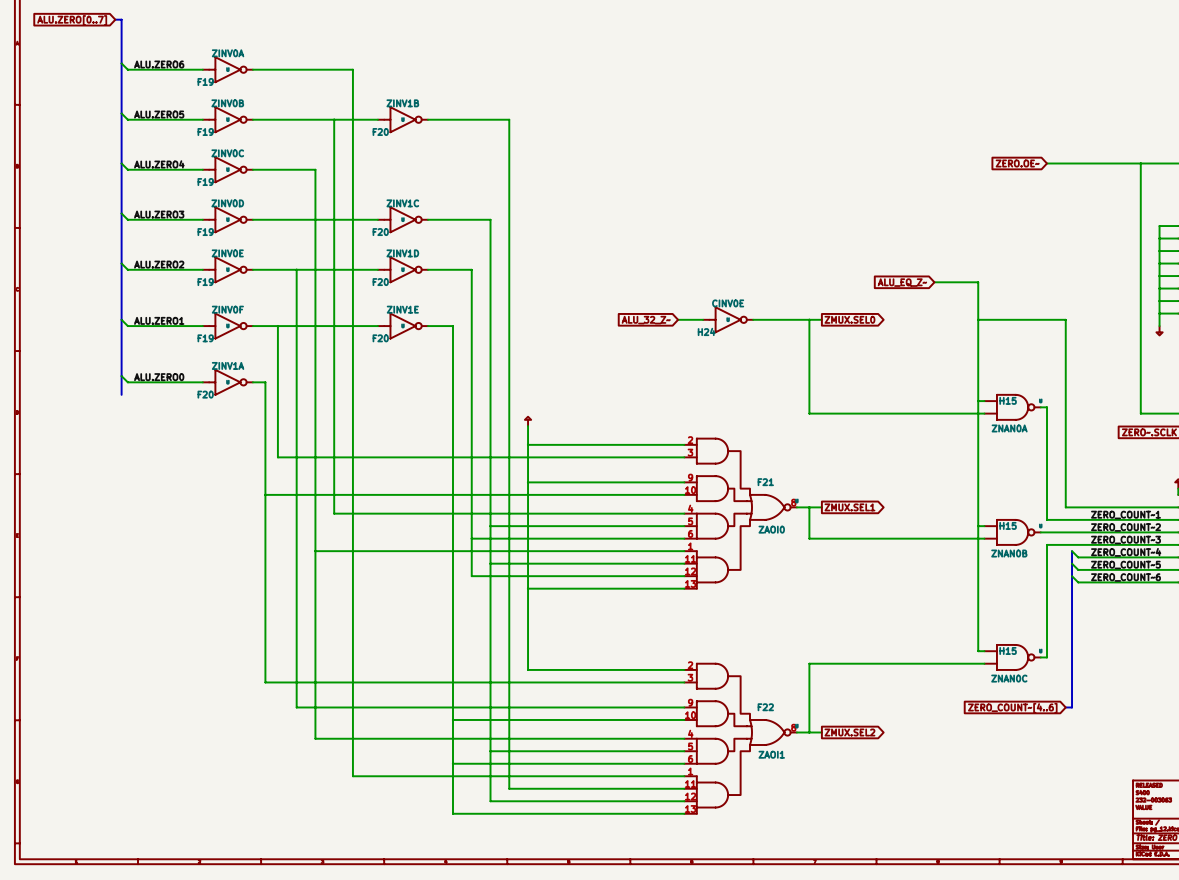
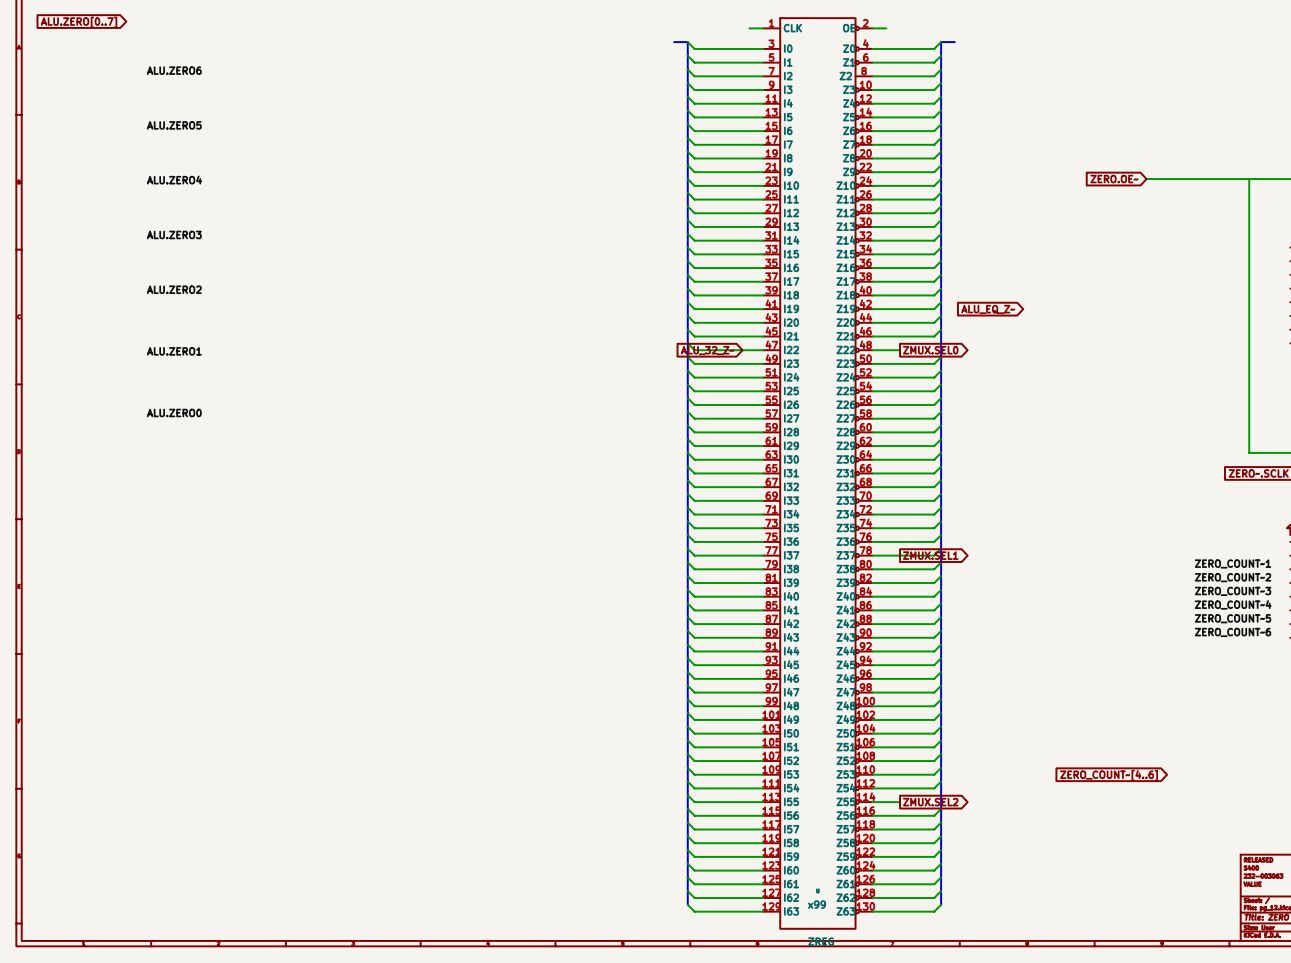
bus: (115, 19) (121, 19) (121, 394) -> none
wire: none -> (749, 28) (763, 28)
wire: none -> (872, 28) (886, 28)
bus: none -> (674, 42) (687, 42) (687, 904)
wire: none -> (687, 42) (694, 48) (763, 48)
wire: none -> (941, 42) (934, 48) (872, 48)
bus: none -> (954, 42) (941, 42) (941, 904)
wire: none -> (687, 55) (694, 62) (763, 62)
wire: none -> (941, 55) (934, 62) (872, 62)
wire: (121, 63) (127, 69) (202, 69) -> none
wire: none -> (687, 69) (694, 76) (763, 76)
wire: none -> (941, 69) (934, 76) (872, 76)
part: (227, 69) -> none
wire: (252, 69) (352, 69) (352, 776) (684, 776) -> none
wire: none -> (687, 83) (694, 90) (763, 90)
wire: none -> (941, 83) (934, 90) (872, 90)
wire: none -> (687, 96) (694, 103) (763, 103)
wire: none -> (941, 96) (934, 103) (872, 103)
wire: none -> (687, 110) (694, 117) (763, 117)
wire: none -> (941, 110) (934, 117) (872, 117)
wire: (121, 113) (127, 119) (202, 119) -> none
wire: none -> (687, 124) (694, 131) (763, 131)
wire: none -> (941, 124) (934, 131) (872, 131)
part: (227, 119) -> none
wire: (252, 119) (377, 119) -> none
wire: (334, 119) (334, 513) (684, 513) -> none
part: (402, 119) -> none
wire: (427, 119) (509, 119) (509, 788) (684, 788) -> none
wire: none -> (687, 137) (694, 144) (763, 144)
wire: none -> (941, 137) (934, 144) (872, 144)
wire: none -> (687, 151) (694, 158) (763, 158)
wire: none -> (941, 151) (934, 158) (872, 158)
wire: none -> (687, 165) (694, 172) (763, 172)
wire: none -> (941, 165) (934, 172) (872, 172)
wire: (121, 163) (127, 169) (202, 169) -> none
wire: none -> (687, 179) (694, 185) (763, 185)
wire: none -> (941, 179) (934, 185) (872, 185)
part: (227, 169) -> none
wire: (252, 169) (315, 169) (315, 738) (684, 738) -> none
wire: none -> (687, 192) (694, 199) (763, 199)
wire: none -> (941, 192) (934, 199) (872, 199)
wire: none -> (687, 206) (694, 213) (763, 213)
wire: none -> (941, 206) (934, 213) (872, 213)
wire: none -> (687, 220) (694, 226) (763, 226)
wire: none -> (941, 220) (934, 226) (872, 226)
wire: (121, 213) (127, 219) (202, 219) -> none
wire: none -> (687, 233) (694, 240) (763, 240)
wire: none -> (941, 233) (934, 240) (872, 240)
part: (227, 219) -> none
wire: (252, 219) (377, 219) -> none
part: (402, 219) -> none
wire: (427, 219) (490, 219) (490, 801) (684, 801) -> none
wire: none -> (687, 247) (694, 254) (763, 254)
wire: none -> (941, 247) (934, 254) (872, 254)
wire: (1178, 226) (1159, 226) (1159, 326) -> none
wire: none -> (687, 261) (694, 268) (763, 268)
wire: none -> (941, 261) (934, 268) (872, 268)
wire: (1159, 238) (1178, 238) -> none
wire: none -> (687, 274) (694, 281) (763, 281)
wire: none -> (941, 274) (934, 281) (872, 281)
wire: (1159, 251) (1178, 251) -> none
wire: (121, 263) (127, 269) (202, 269) -> none
wire: none -> (687, 288) (694, 295) (763, 295)
wire: none -> (941, 288) (934, 295) (872, 295)
wire: (1159, 263) (1178, 263) -> none
part: (227, 269) -> none
wire: (252, 269) (377, 269) -> none
wire: (296, 269) (296, 707) (634, 707) -> (687, 767) (694, 774)
part: (402, 269) -> none
wire: (427, 269) (471, 269) (471, 576) (684, 576) -> none
wire: none -> (687, 302) (694, 309) (763, 309)
wire: none -> (941, 302) (934, 309) (872, 309)
wire: (1159, 276) (1178, 276) -> none
wire: (934, 282) (978, 282) (978, 651) (984, 651) -> none
wire: none -> (687, 315) (694, 322) (763, 322)
wire: none -> (941, 315) (934, 322) (872, 322)
wire: (1159, 288) (1178, 288) -> none
wire: none -> (687, 329) (694, 336) (763, 336)
wire: none -> (941, 329) (934, 336) (872, 336)
wire: (1159, 301) (1178, 301) -> none
wire: none -> (687, 343) (694, 350) (742, 350)
wire: (1159, 313) (1178, 313) -> none
wire: (121, 319) (127, 326) (202, 326) -> none
part: (728, 319) -> none
wire: (753, 319) (796, 319) -> none
wire: (809, 319) (809, 413) (984, 413) -> none
wire: (978, 319) (1065, 319) (1065, 507) (1178, 507) -> none
part: (227, 326) -> none
wire: (252, 326) (377, 326) -> none
wire: (277, 326) (277, 457) (634, 457) -> (687, 494) (694, 500)
part: (402, 326) -> none
wire: (427, 326) (452, 326) (452, 813) (684, 813) -> none
wire: none -> (687, 357) (694, 363) (763, 363)
wire: none -> (941, 357) (934, 363) (872, 363)
power symbol: (1159, 330) -> none
wire: none -> (687, 370) (694, 377) (763, 377)
wire: none -> (941, 370) (934, 377) (872, 377)
wire: none -> (687, 384) (694, 391) (763, 391)
wire: none -> (941, 384) (934, 391) (872, 391)
wire: none -> (687, 398) (694, 404) (763, 404)
wire: none -> (941, 398) (934, 404) (872, 404)
wire: (121, 376) (127, 382) (202, 382) -> none
wire: none -> (687, 411) (694, 418) (763, 418)
wire: none -> (941, 411) (934, 418) (872, 418)
part: (227, 382) -> none
wire: (252, 382) (265, 382) (265, 682) (634, 682) -> (687, 740) (694, 747)
wire: none -> (687, 425) (694, 432) (763, 432)
wire: none -> (941, 425) (934, 432) (872, 432)
wire: none -> (687, 439) (694, 446) (763, 446)
wire: none -> (941, 439) (934, 446) (872, 446)
wire: (978, 401) (984, 401) -> none
part: (1012, 407) -> none
wire: (1040, 407) (1047, 407) (1047, 519) (1178, 519) -> none
wire: none -> (687, 452) (694, 459) (763, 459)
wire: none -> (941, 452) (934, 459) (872, 459)
power symbol: (528, 421) -> none
wire: (528, 426) (528, 669) (634, 669) -> (687, 726) (694, 733)
wire: none -> (687, 466) (694, 473) (763, 473)
wire: none -> (941, 466) (934, 473) (872, 473)
part: none -> (817, 473)
wire: none -> (941, 480) (934, 487) (872, 487)
wire: (528, 444) (634, 444) -> (687, 480) (694, 487)
wire: none -> (941, 494) (934, 500) (872, 500)
wire: none -> (687, 507) (694, 514) (763, 514)
wire: none -> (941, 507) (934, 514) (872, 514)
wire: none -> (941, 521) (934, 528) (872, 528)
wire: (528, 482) (634, 482) -> (687, 521) (694, 528)
wire: none -> (941, 535) (934, 541) (872, 541)
wire: (1178, 488) (1178, 494) -> none
wire: (265, 494) (634, 494) -> (687, 535) (694, 541)
wire: none -> (687, 548) (694, 555) (763, 555)
wire: none -> (941, 548) (934, 555) (900, 555)
wire: (809, 507) (809, 538) (984, 538) -> none
wire: none -> (687, 562) (694, 569) (763, 569)
part: (740, 513) -> none
wire: none -> (941, 562) (934, 569) (872, 569)
wire: (490, 526) (684, 526) -> none
wire: none -> (687, 576) (694, 583) (763, 583)
wire: none -> (941, 576) (934, 583) (872, 583)
wire: (978, 526) (984, 526) -> none
part: (1012, 532) -> none
wire: (1040, 532) (1178, 532) -> none
wire: (471, 538) (684, 538) -> none
wire: none -> (687, 589) (694, 596) (763, 596)
wire: none -> (941, 589) (934, 596) (872, 596)
wire: (1178, 544) (1047, 544) (1047, 657) (1040, 657) -> none
wire: (315, 551) (684, 551) -> none
wire: none -> (687, 603) (694, 610) (763, 610)
wire: none -> (941, 603) (934, 610) (872, 610)
wire: (1072, 551) (1078, 557) (1178, 557) -> none
bus: (1072, 551) (1072, 707) (1065, 707) -> none
wire: (490, 563) (684, 563) -> none
wire: none -> (687, 617) (694, 624) (763, 624)
wire: none -> (941, 617) (934, 624) (872, 624)
wire: (1072, 563) (1078, 569) (1178, 569) -> none
wire: none -> (687, 630) (694, 637) (763, 637)
wire: none -> (941, 630) (934, 637) (872, 637)
wire: (1072, 576) (1078, 582) (1178, 582) -> none
wire: (528, 588) (684, 588) -> none
wire: none -> (687, 644) (694, 651) (763, 651)
wire: none -> (941, 644) (934, 651) (872, 651)
wire: none -> (687, 658) (694, 665) (763, 665)
wire: none -> (941, 658) (934, 665) (872, 665)
wire: none -> (687, 672) (694, 678) (763, 678)
wire: none -> (941, 672) (934, 678) (872, 678)
wire: none -> (687, 685) (694, 692) (763, 692)
wire: none -> (941, 685) (934, 692) (872, 692)
wire: none -> (687, 699) (694, 706) (763, 706)
wire: none -> (941, 699) (934, 706) (872, 706)
wire: none -> (687, 713) (694, 719) (763, 719)
wire: none -> (941, 713) (934, 719) (872, 719)
part: (1012, 657) -> none
wire: none -> (941, 726) (934, 733) (872, 733)
wire: (984, 663) (809, 663) (809, 732) -> none
wire: none -> (941, 740) (934, 747) (872, 747)
wire: none -> (687, 754) (694, 761) (763, 761)
wire: none -> (941, 754) (934, 761) (872, 761)
wire: none -> (941, 767) (934, 774) (872, 774)
wire: none -> (941, 781) (934, 788) (872, 788)
wire: (452, 719) (634, 719) -> (687, 781) (694, 788)
wire: none -> (687, 795) (694, 802) (763, 802)
wire: none -> (687, 808) (694, 815) (763, 815)
part: (740, 738) -> none
wire: none -> (941, 808) (934, 815) (872, 815)
wire: (490, 751) (684, 751) -> none
wire: none -> (687, 822) (694, 829) (763, 829)
wire: none -> (941, 822) (934, 829) (872, 829)
wire: (452, 763) (684, 763) -> none
wire: none -> (687, 836) (694, 843) (763, 843)
wire: none -> (941, 836) (934, 843) (872, 843)
wire: none -> (687, 850) (694, 856) (763, 856)
wire: none -> (941, 850) (934, 856) (872, 856)
wire: none -> (687, 863) (694, 870) (763, 870)
wire: none -> (941, 863) (934, 870) (872, 870)
wire: none -> (687, 877) (694, 884) (763, 884)
wire: none -> (941, 877) (934, 884) (872, 884)
wire: none -> (687, 891) (694, 897) (763, 897)
wire: none -> (941, 891) (934, 897) (872, 897)
wire: none -> (687, 904) (694, 911) (763, 911)
wire: none -> (941, 904) (934, 911) (872, 911)

